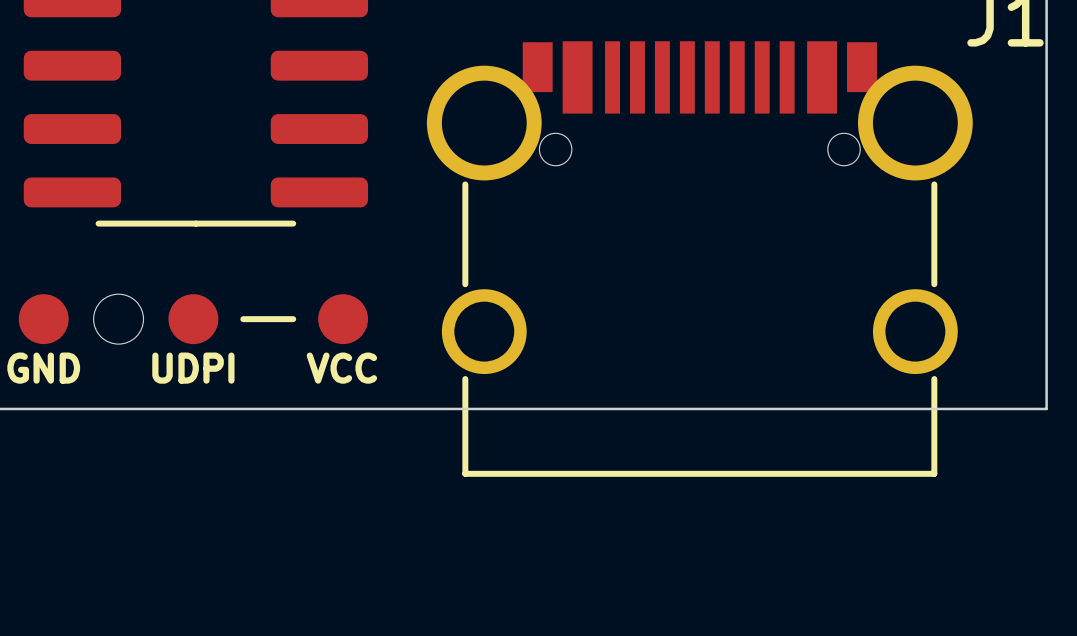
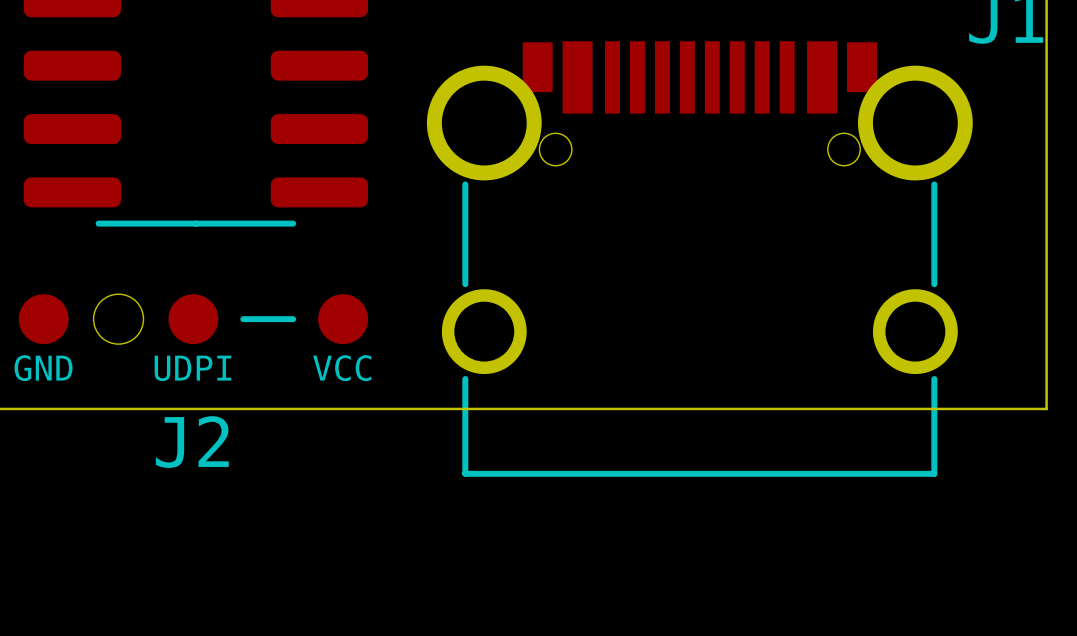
J2 name: none -> J2 (192, 442)

